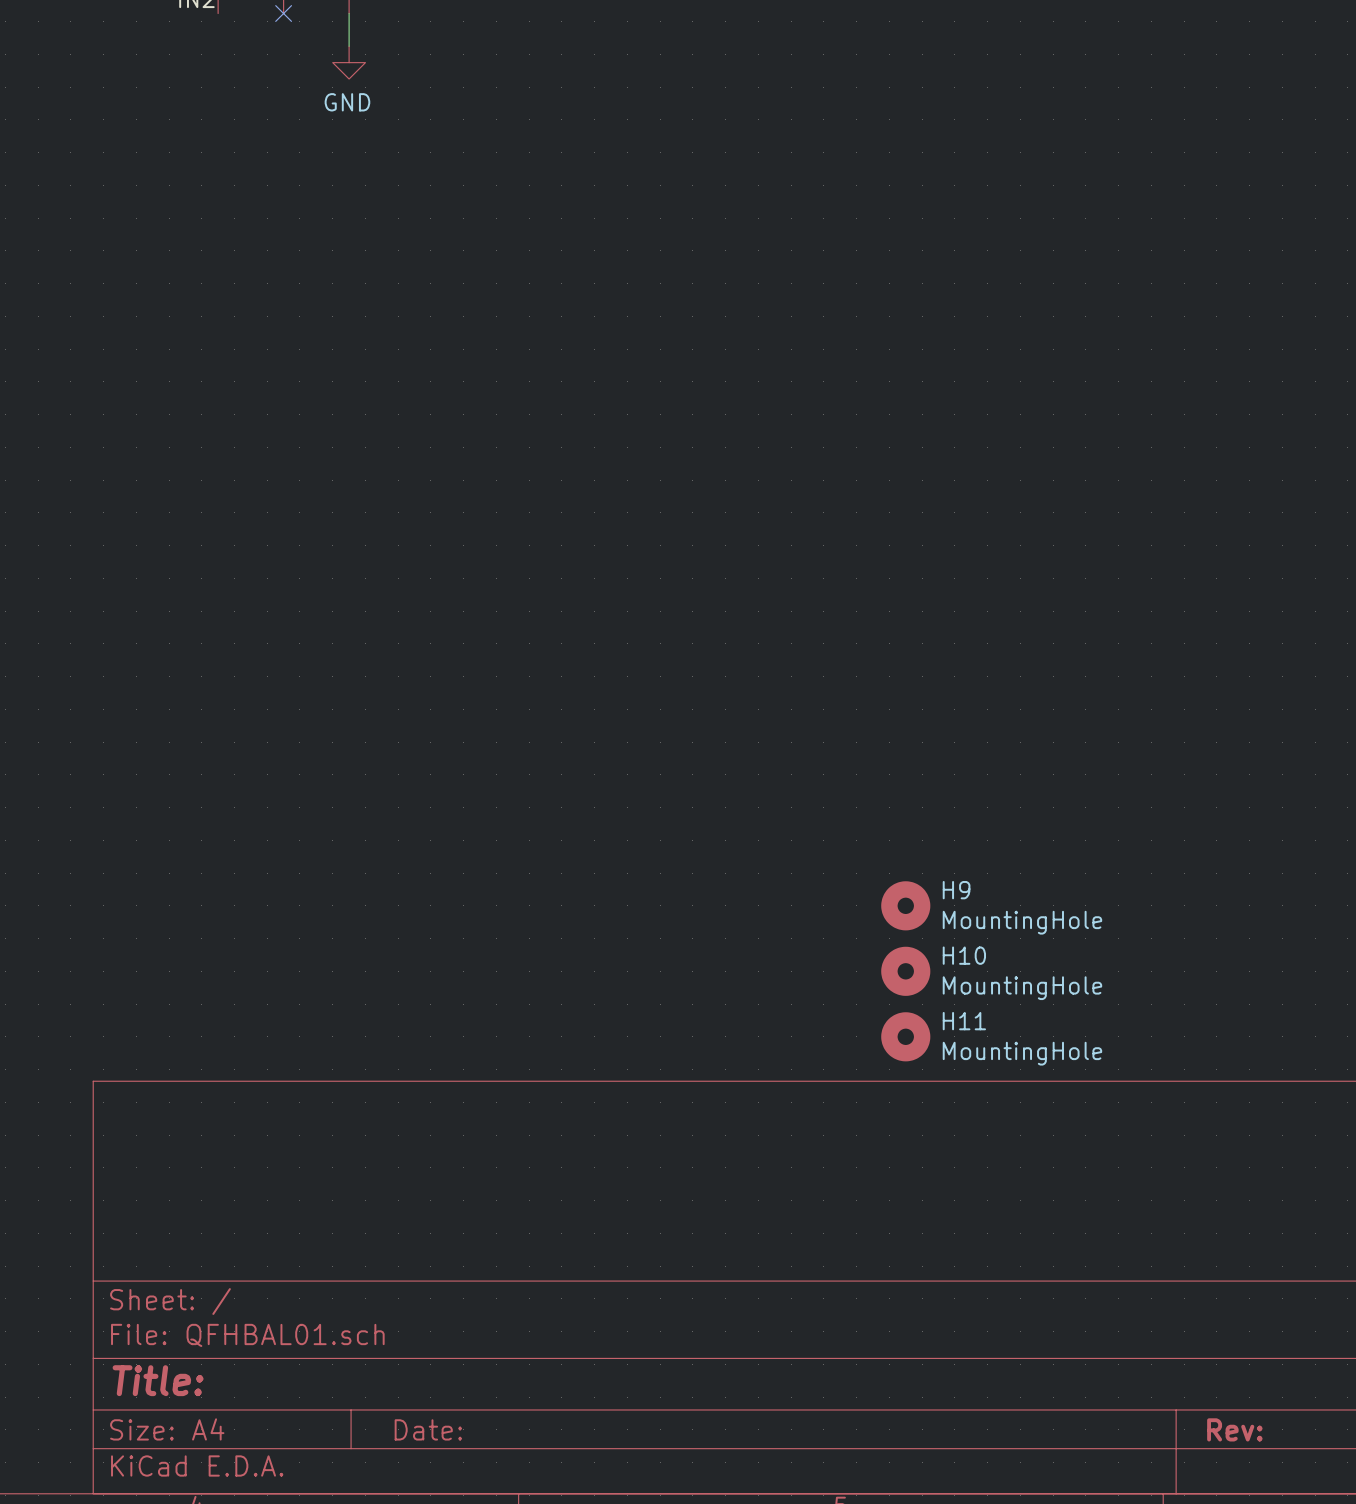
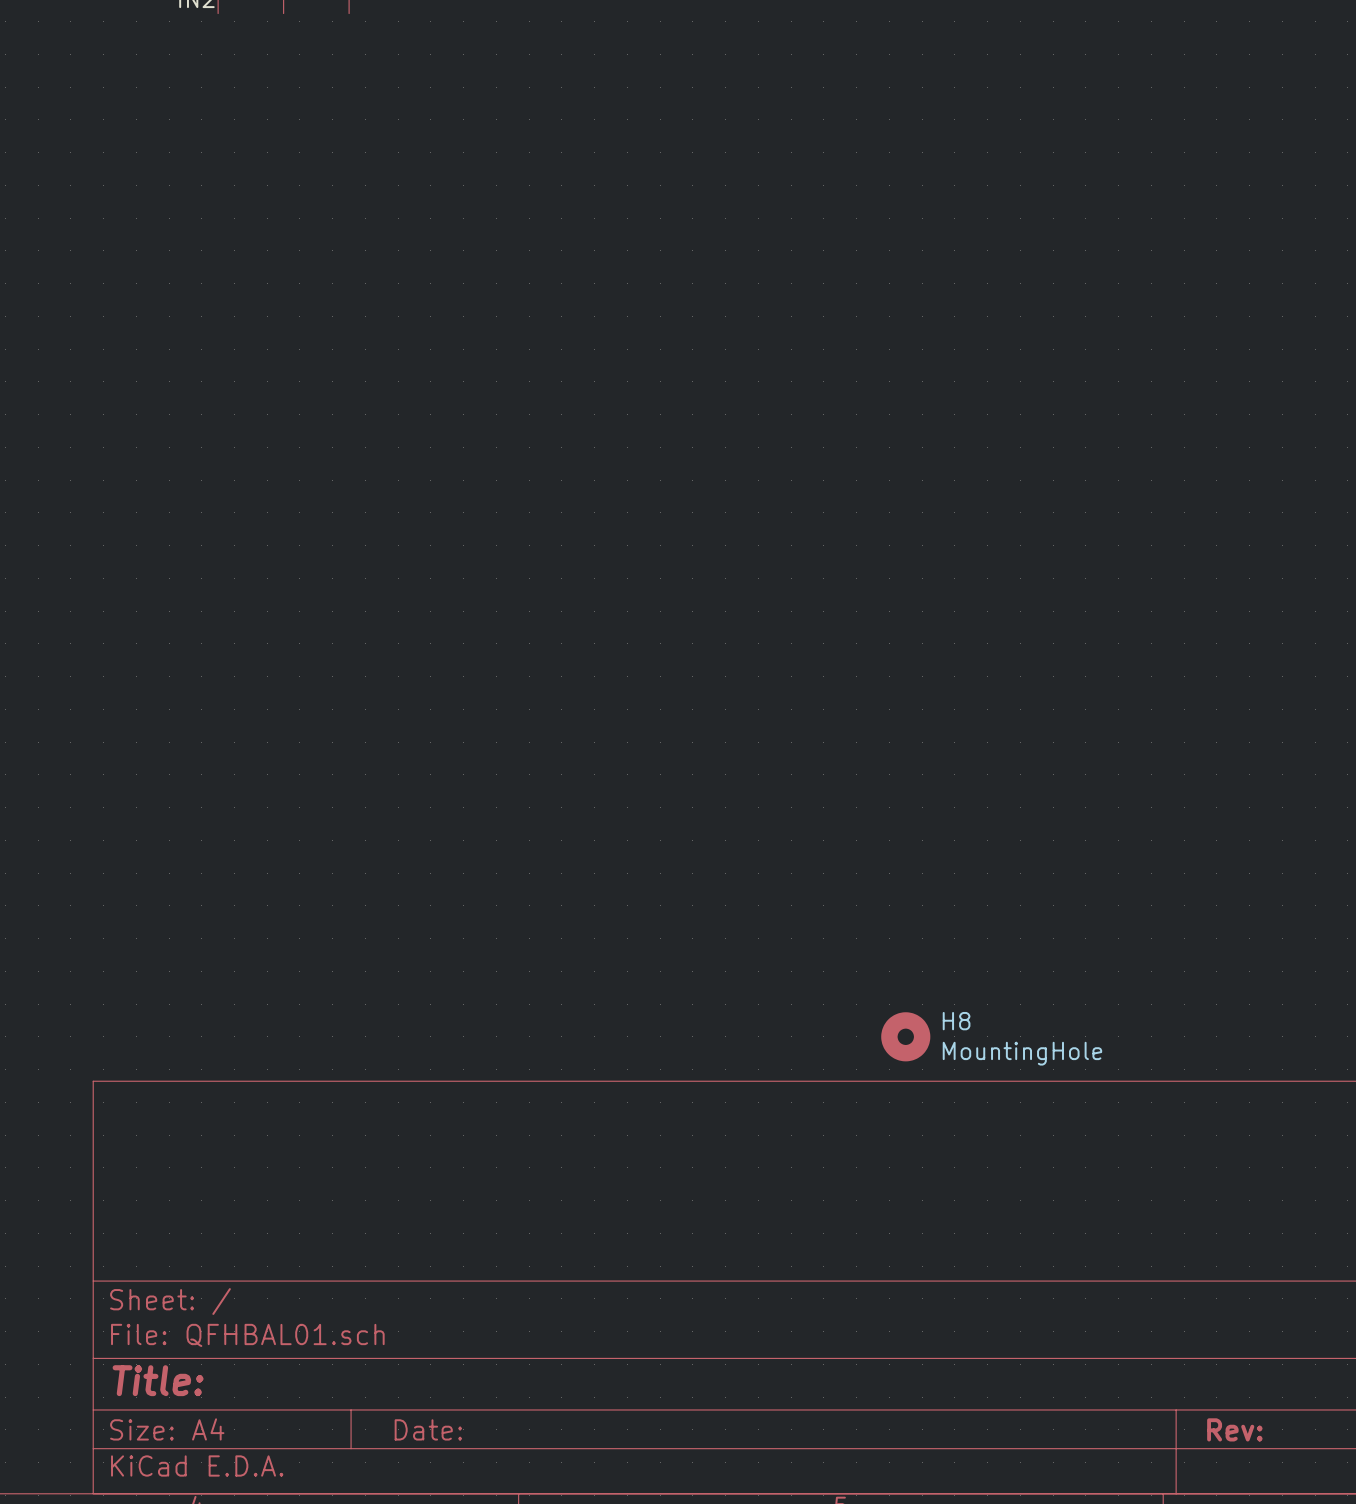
no-connect mark: (283, 13) -> none
wire: (349, 13) (349, 46) -> none
power symbol: GND (349, 62) -> none
H9: MountingHole (905, 905) -> none
H10: MountingHole (905, 971) -> none
H11 name: H11 (964, 1021) -> H8 (956, 1021)

